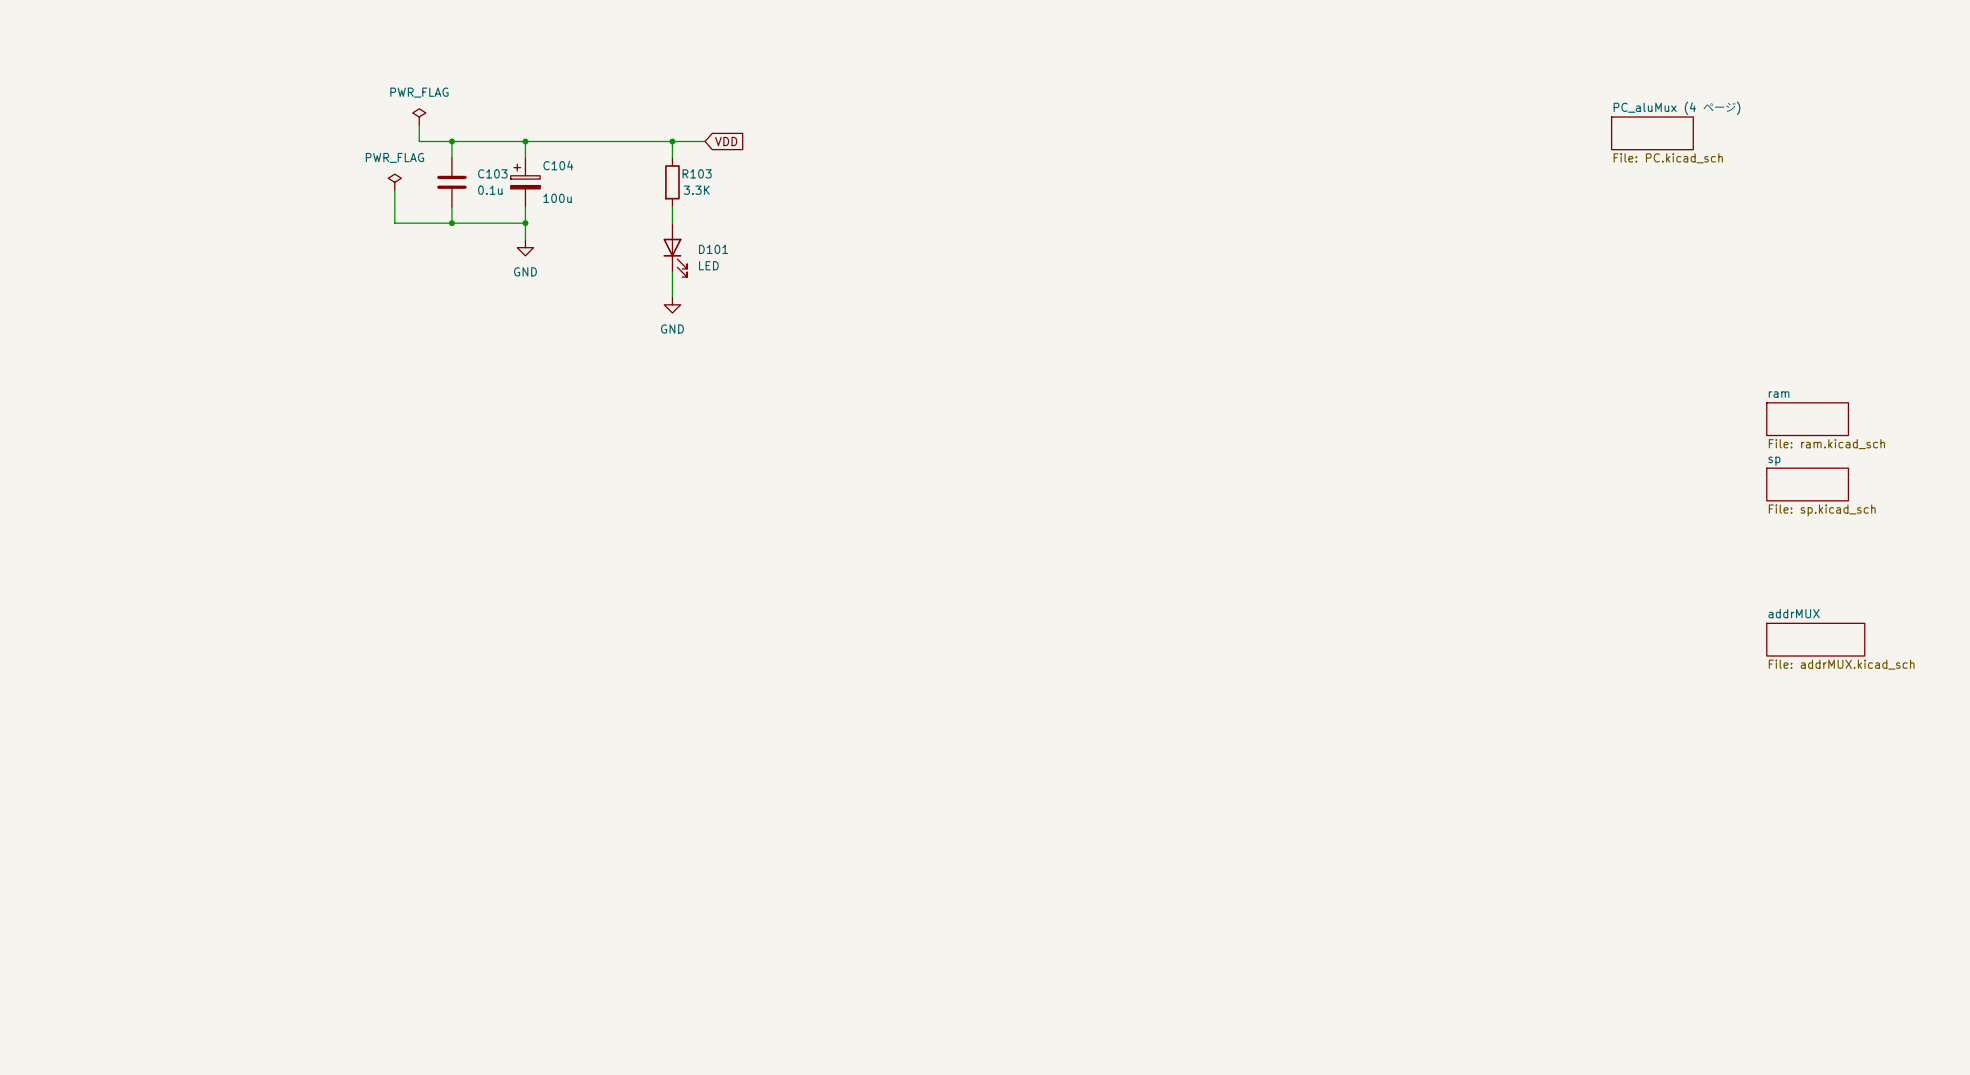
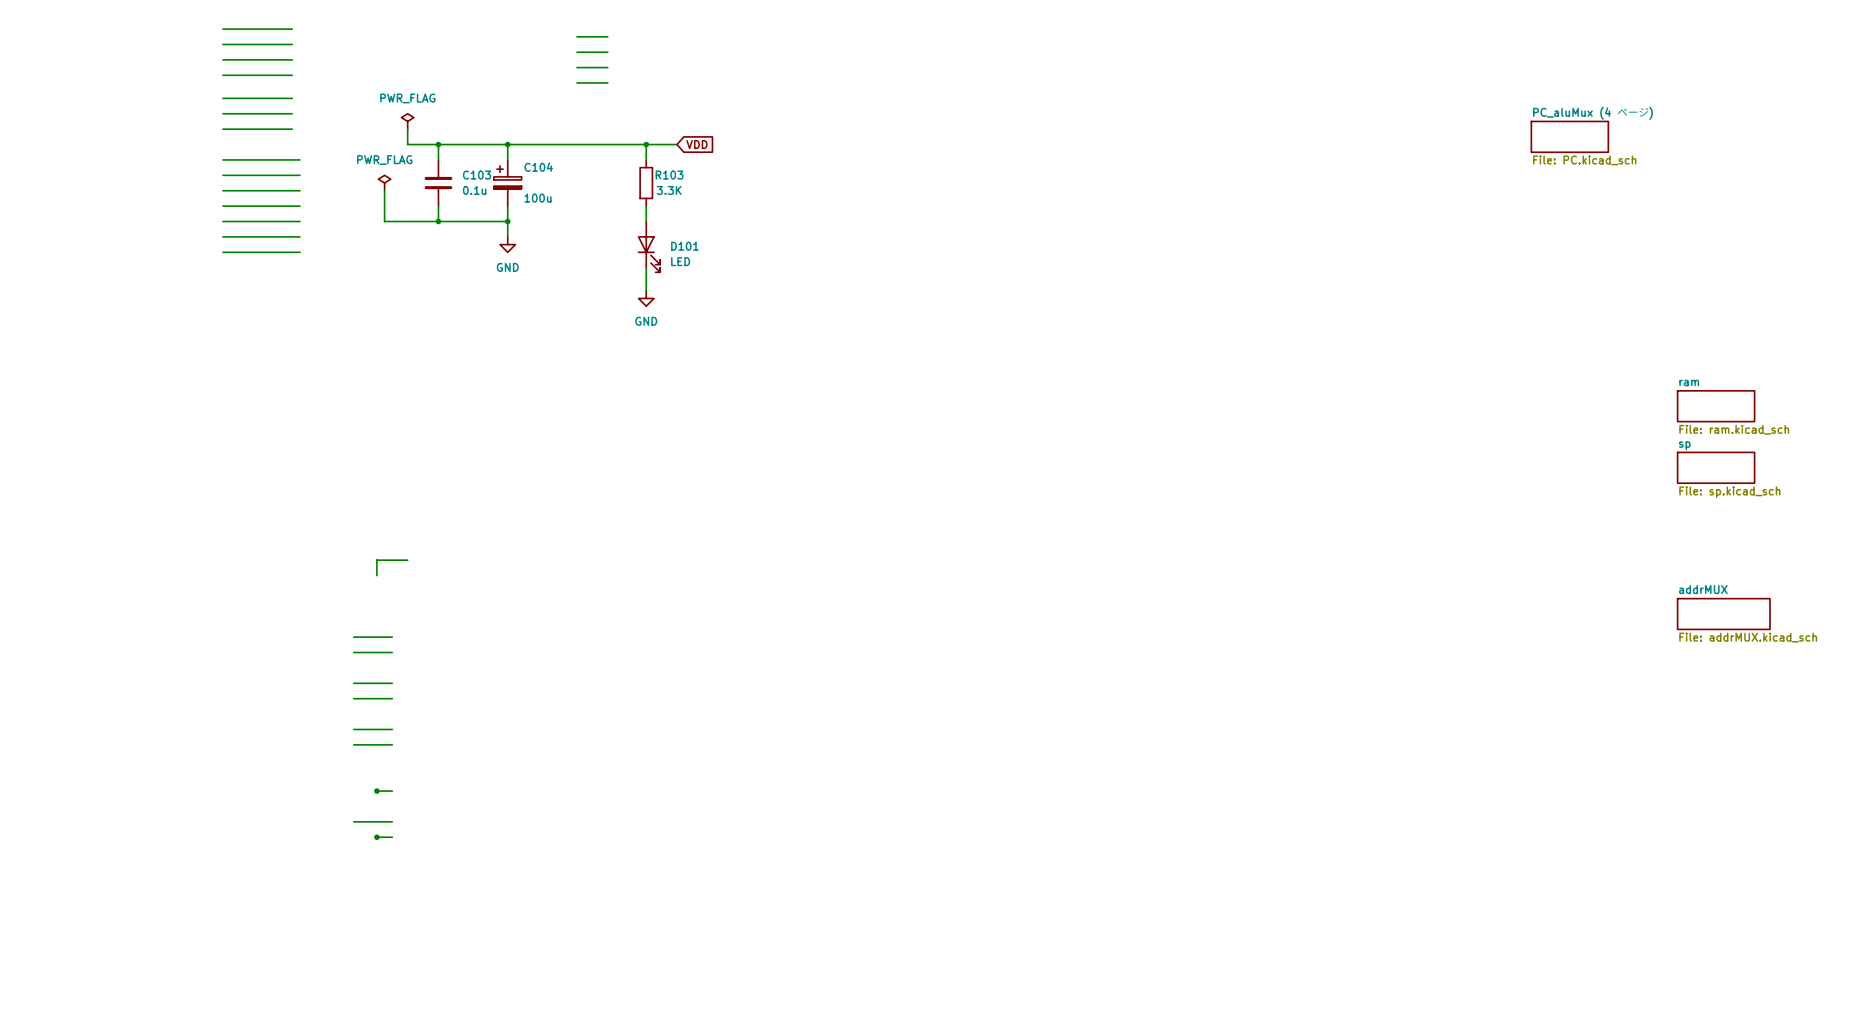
wire: none -> (222, 29) (292, 29)
wire: none -> (577, 36) (607, 36)
wire: none -> (222, 44) (292, 44)
wire: none -> (577, 52) (607, 52)
wire: none -> (222, 59) (292, 59)
wire: none -> (577, 67) (607, 67)
wire: none -> (222, 75) (292, 75)
wire: none -> (577, 82) (607, 82)
wire: none -> (222, 98) (292, 98)
wire: none -> (222, 113) (292, 113)
wire: none -> (222, 129) (292, 129)
wire: none -> (222, 159) (299, 159)
wire: none -> (222, 175) (299, 175)
wire: none -> (222, 190) (299, 190)
wire: none -> (222, 206) (299, 206)
wire: none -> (222, 221) (299, 221)
wire: none -> (222, 236) (299, 236)
wire: none -> (222, 252) (299, 252)
wire: none -> (407, 560) (376, 560) (376, 575)
wire: none -> (353, 637) (392, 637)
wire: none -> (353, 652) (392, 652)
wire: none -> (353, 683) (392, 683)
wire: none -> (353, 698) (392, 698)
wire: none -> (353, 729) (392, 729)
wire: none -> (353, 744) (392, 744)
wire: none -> (376, 791) (392, 791)
junction: none -> (376, 791)
wire: none -> (353, 821) (392, 821)
wire: none -> (376, 837) (392, 837)
junction: none -> (376, 837)

